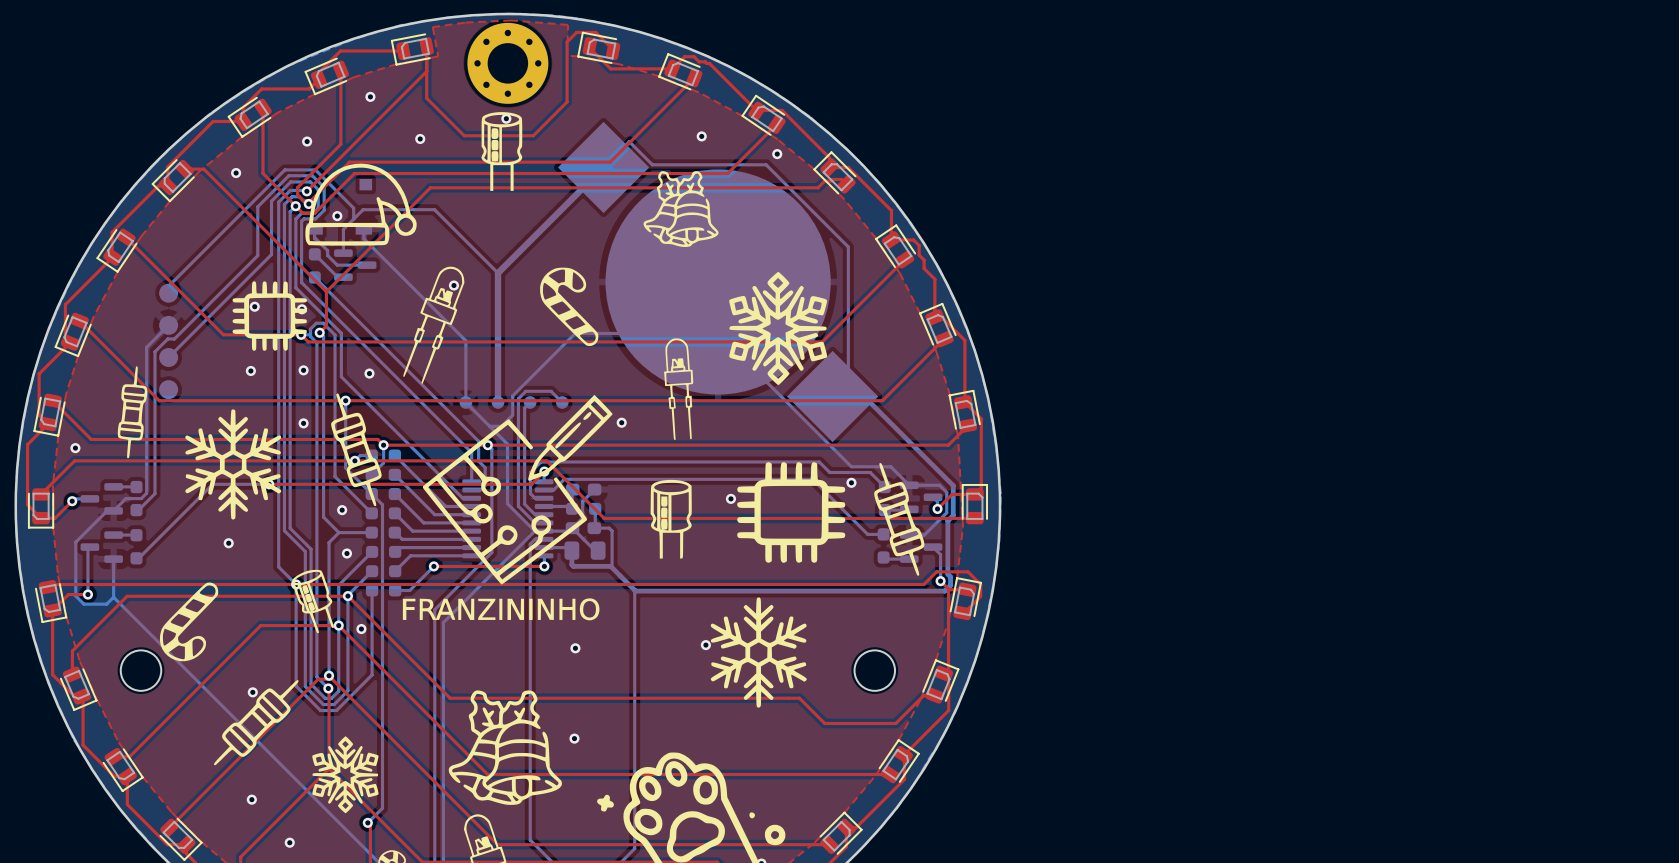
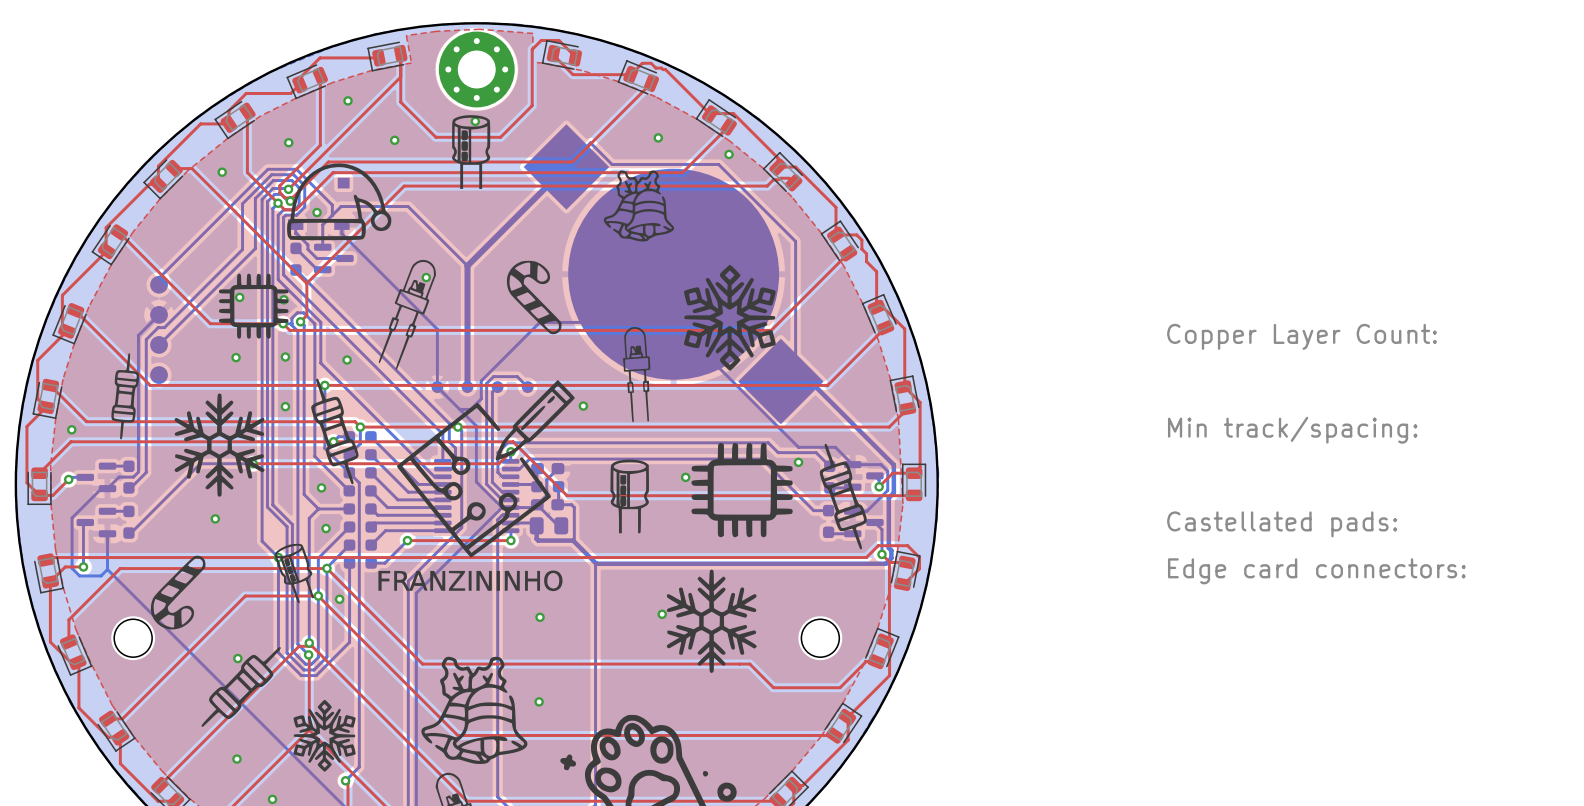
text: none -> Copper Layer Count: (1302, 336)
text: none -> Min track/spacing: (1292, 430)
text: none -> Castellated pads: (1282, 524)
text: none -> Edge card connectors: (1316, 571)

